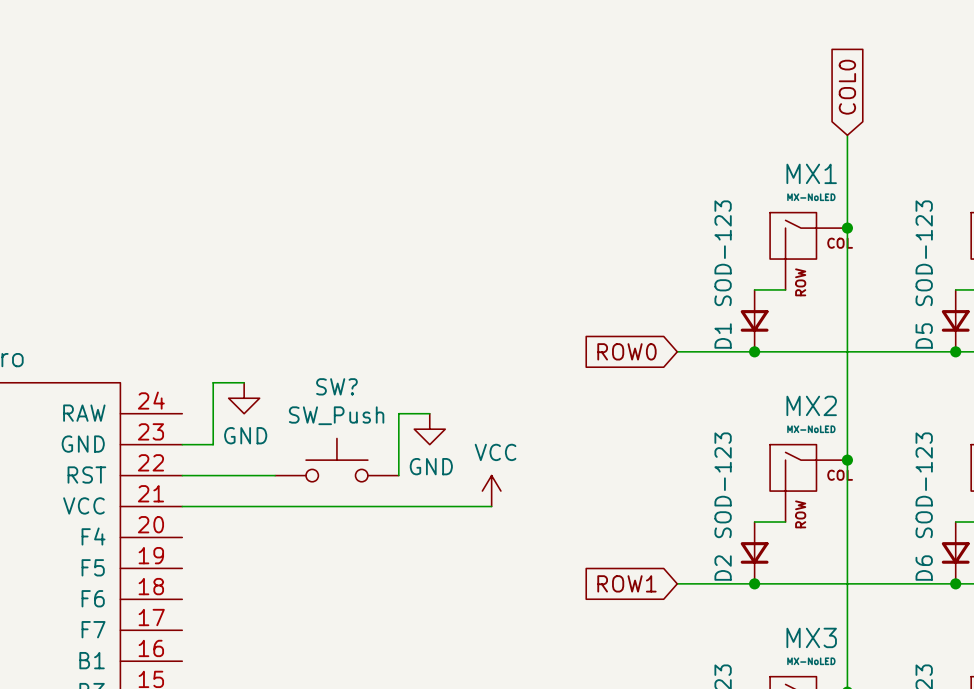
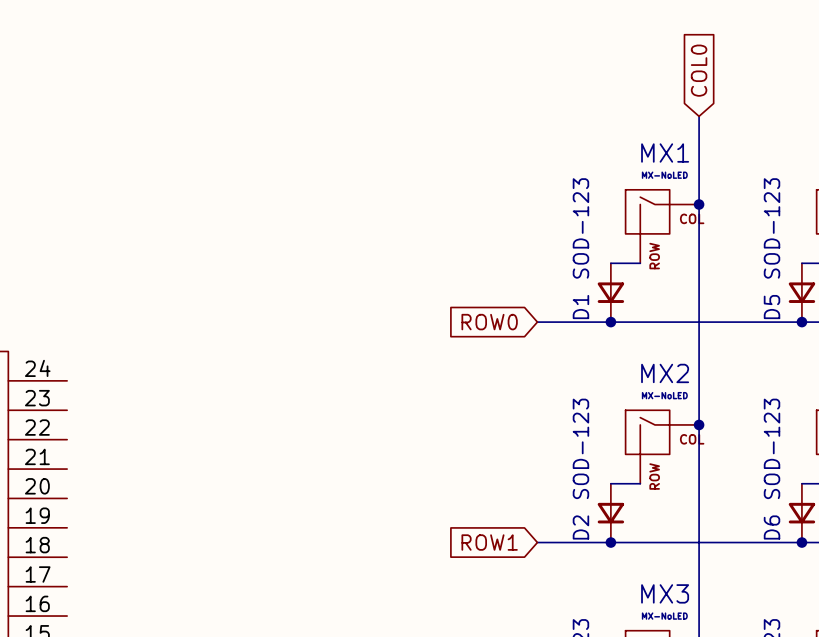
wire: (244, 382) (213, 382) (213, 444) (182, 444) -> none
power symbol: GND (244, 398) -> none
wire: (429, 413) (398, 413) (398, 475) -> none
power symbol: GND (429, 429) -> none
SW?: SW_Push (336, 460) -> none
wire: (182, 475) (275, 475) -> none
power symbol: VCC (491, 491) -> none
wire: (182, 506) (491, 506) -> none

